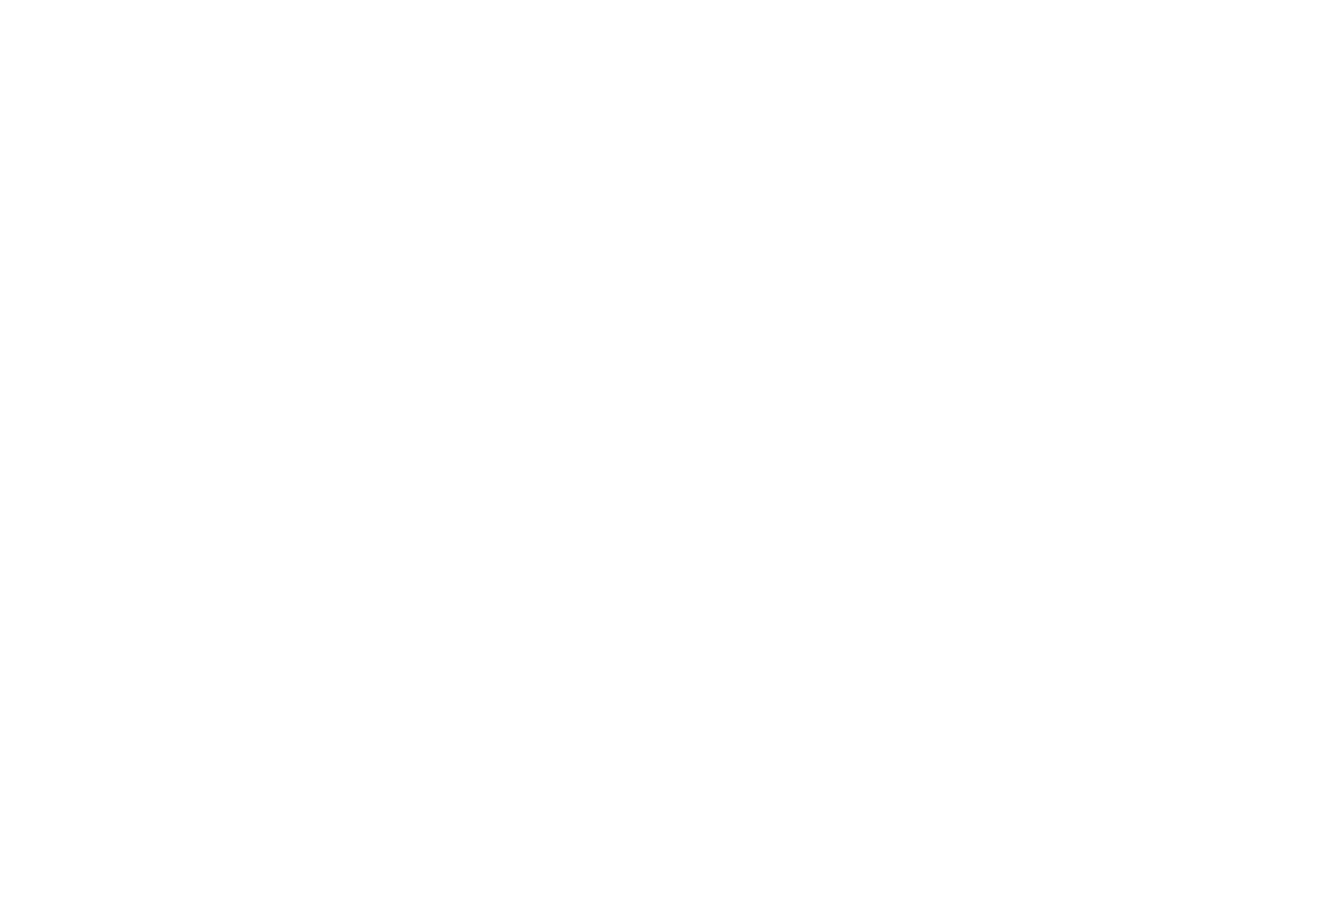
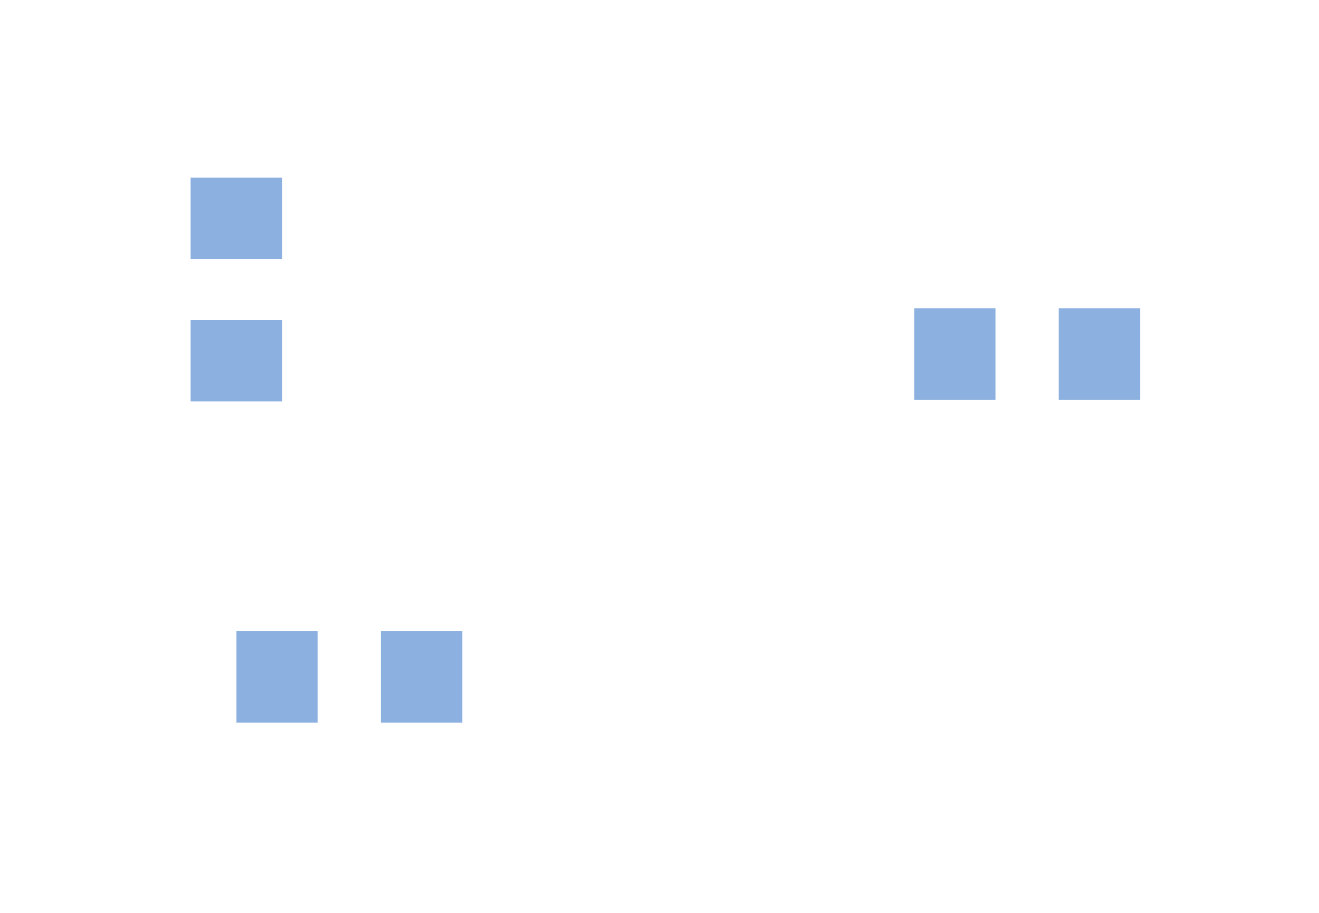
part: none -> (236, 289)
part: none -> (1027, 354)
part: none -> (349, 676)

